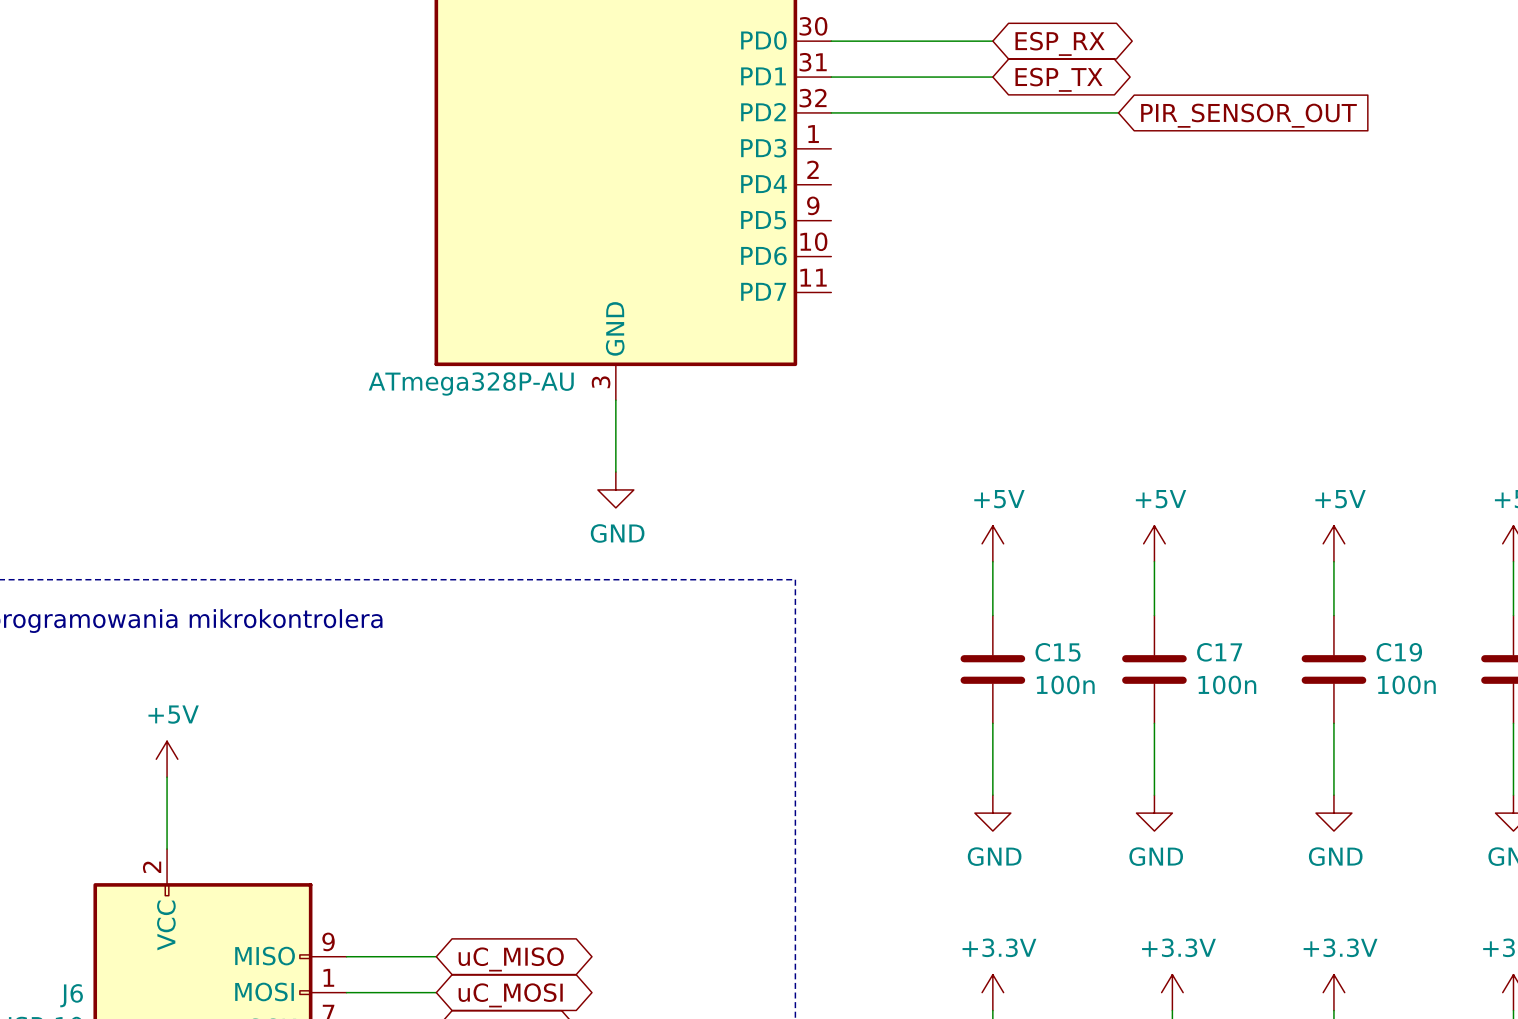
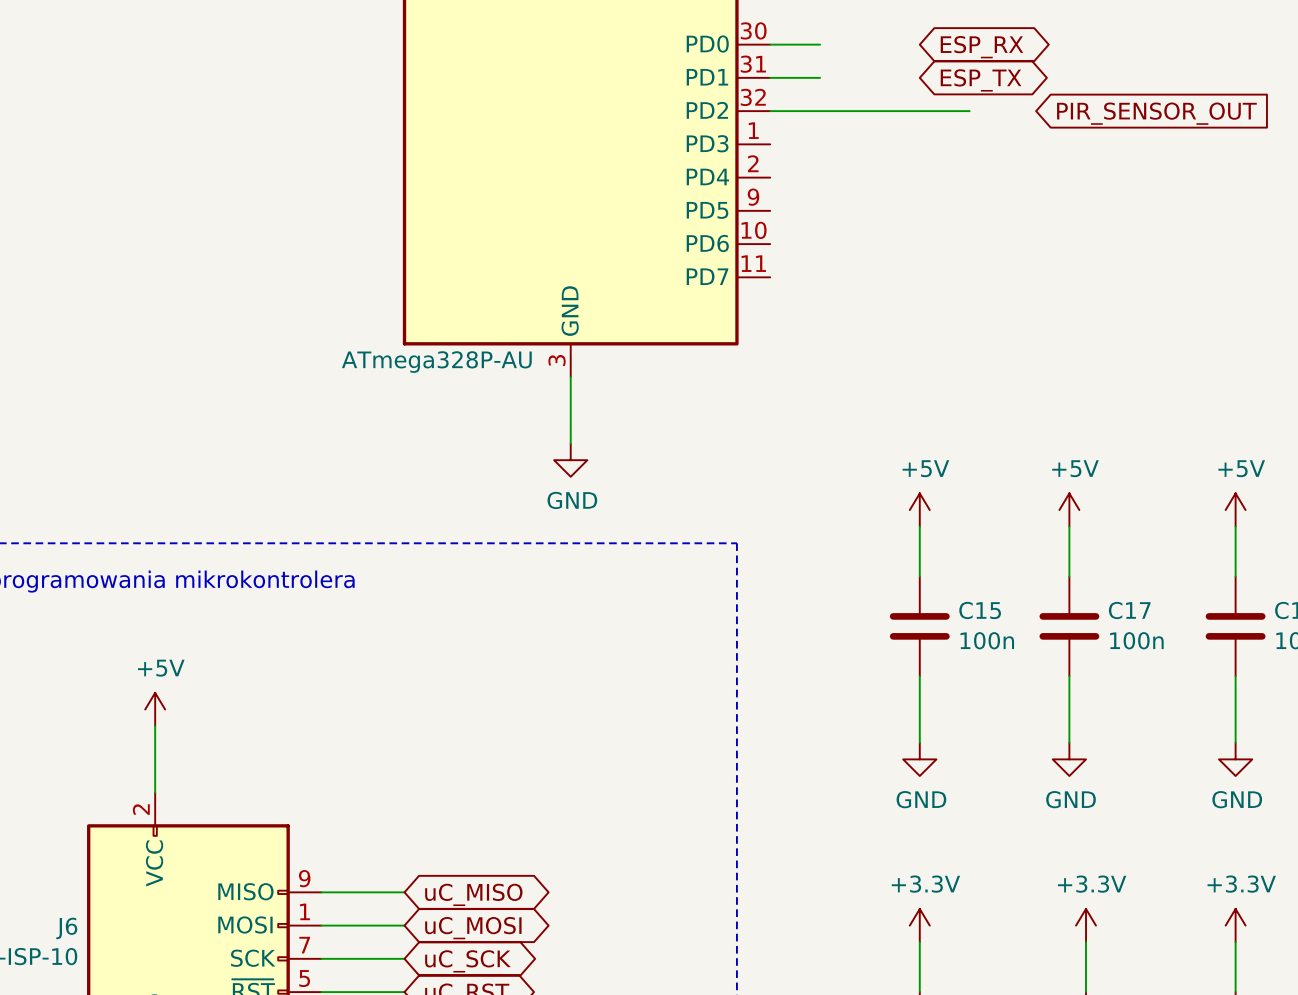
wire: (885, 41) (992, 41) -> none
wire: (885, 77) (992, 77) -> none
wire: (1046, 112) (1118, 112) -> none

